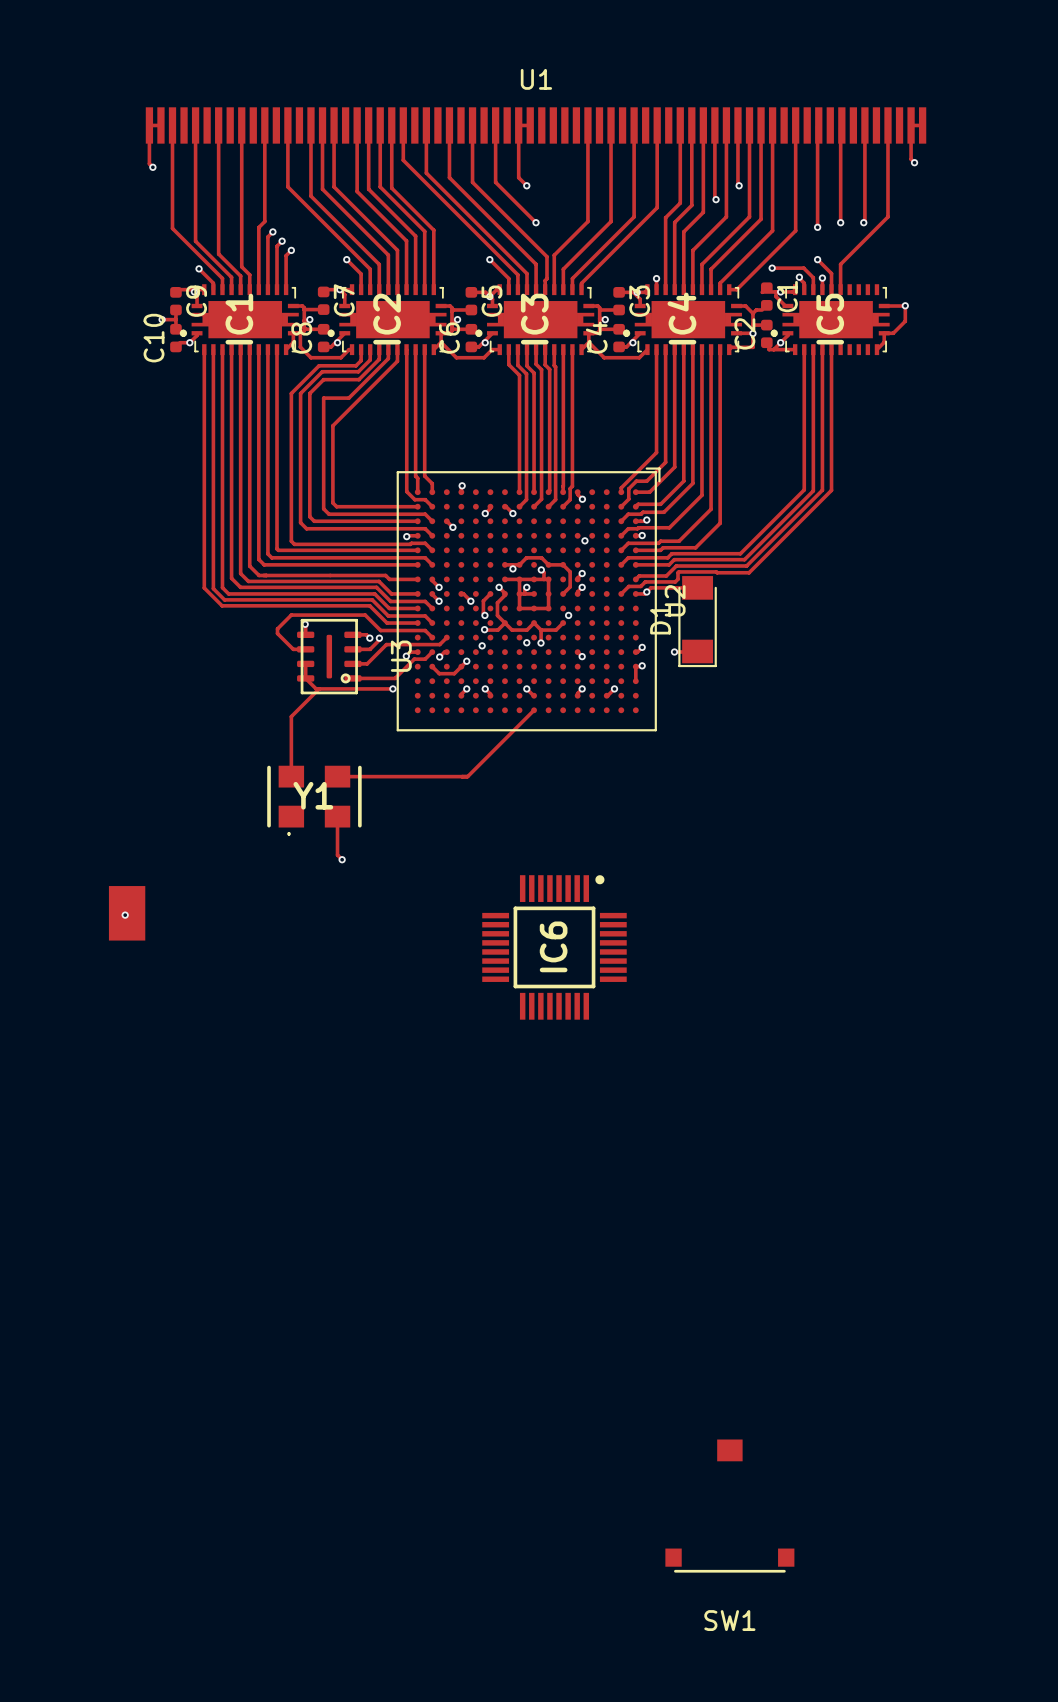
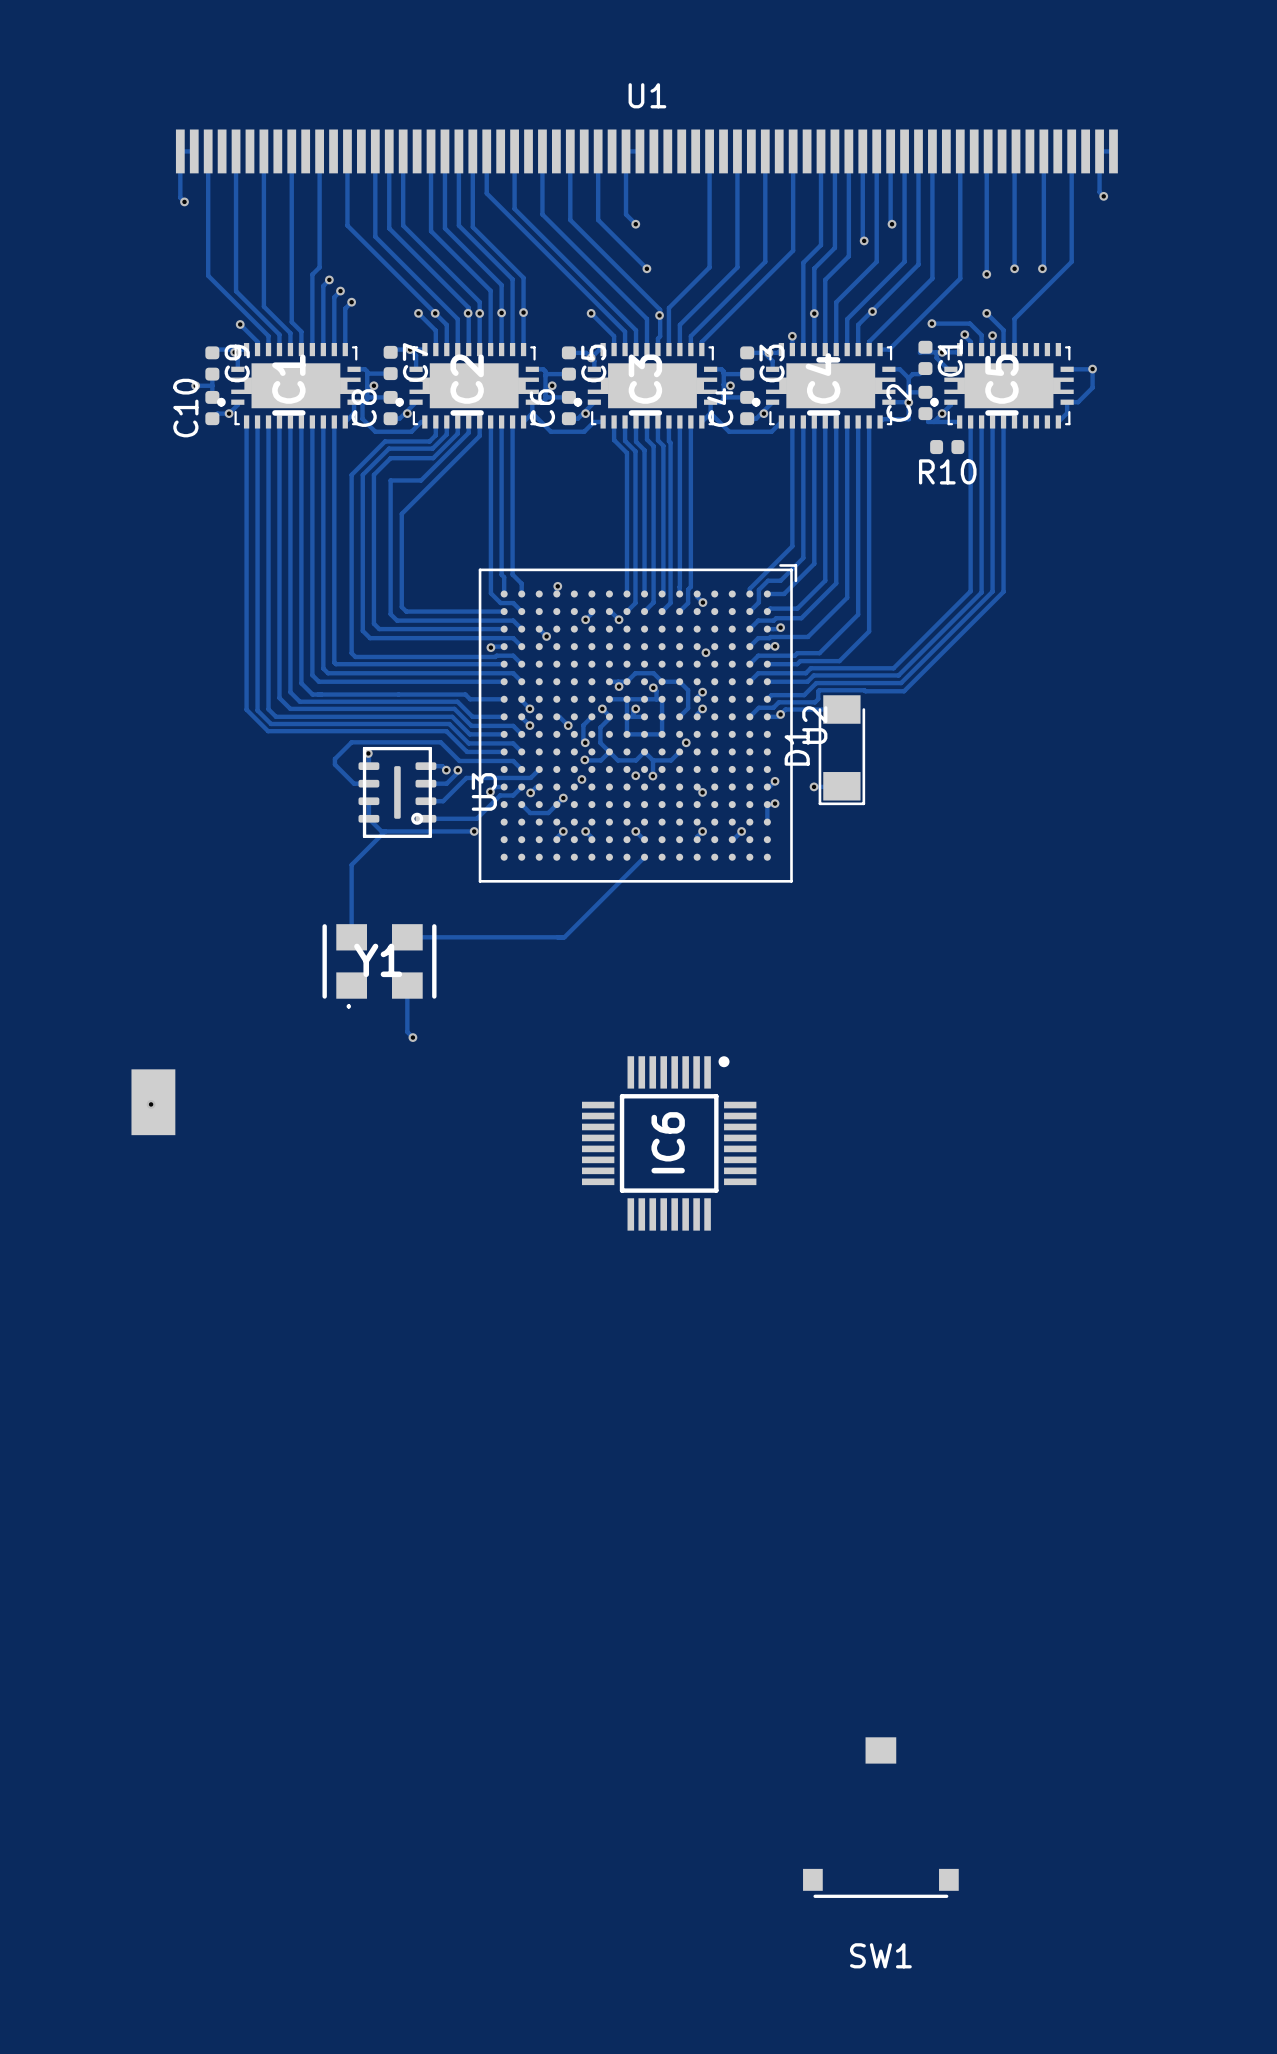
via: none -> (523, 312)
via: none -> (872, 311)
via: none -> (435, 313)
via: none -> (468, 313)
via: none -> (479, 313)
via: none -> (501, 312)
via: none -> (814, 313)
via: none -> (659, 315)
R10: none -> (947, 447)

